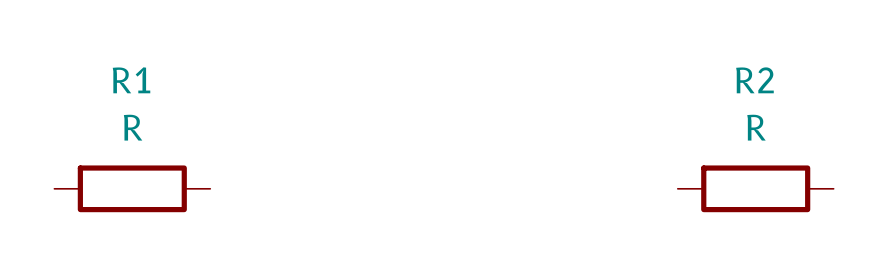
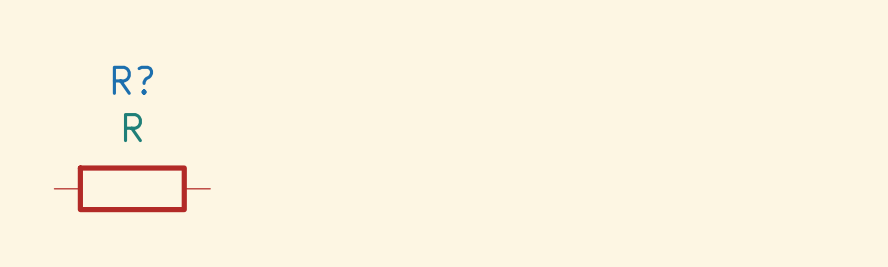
R1 name: R1 (131, 80) -> R? (132, 80)
R2: R (755, 188) -> none

